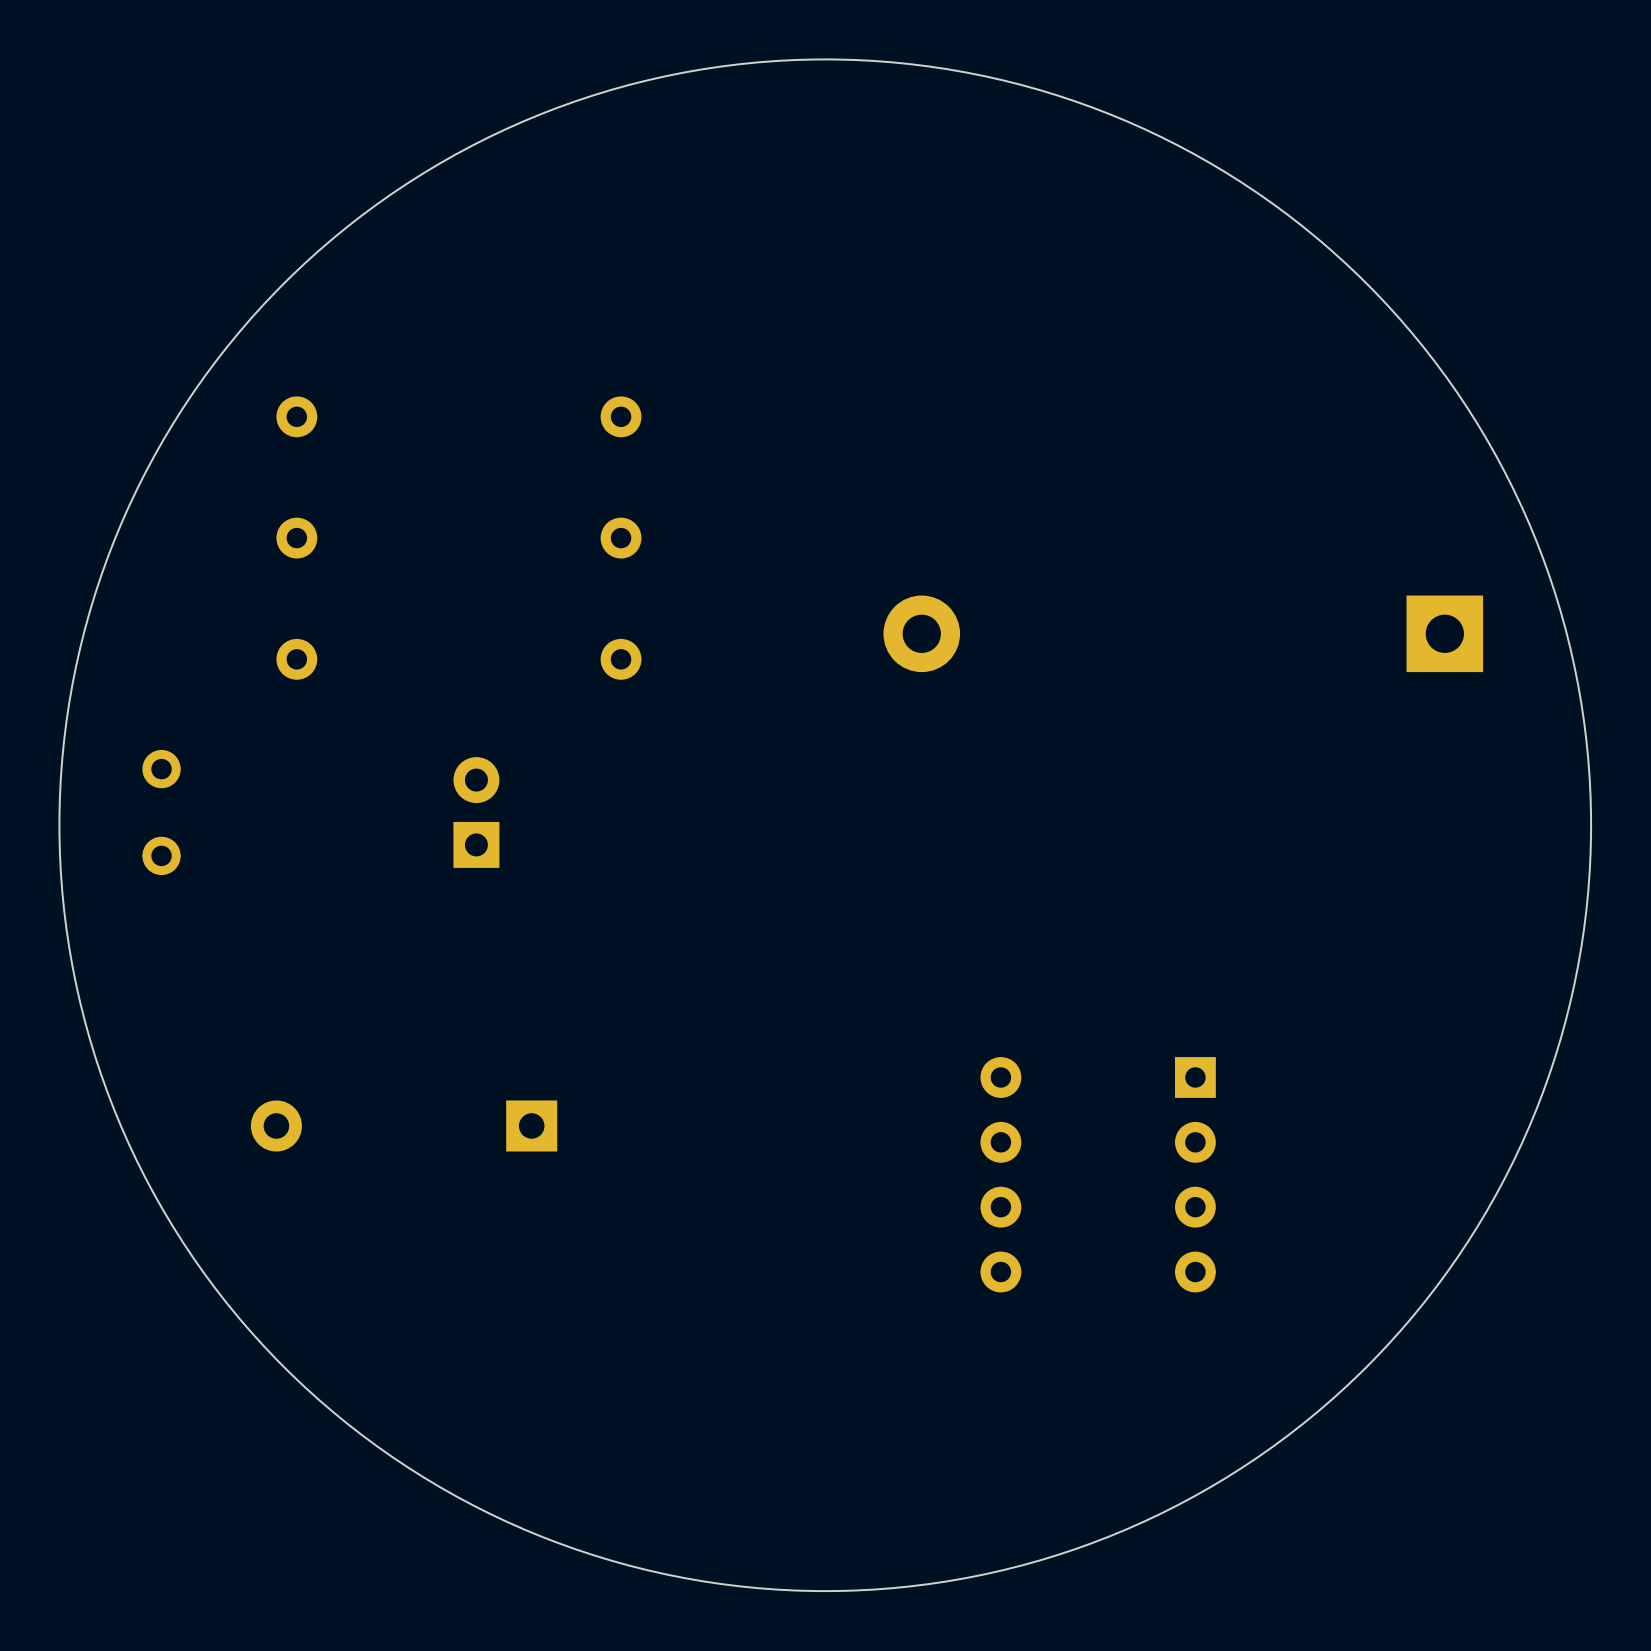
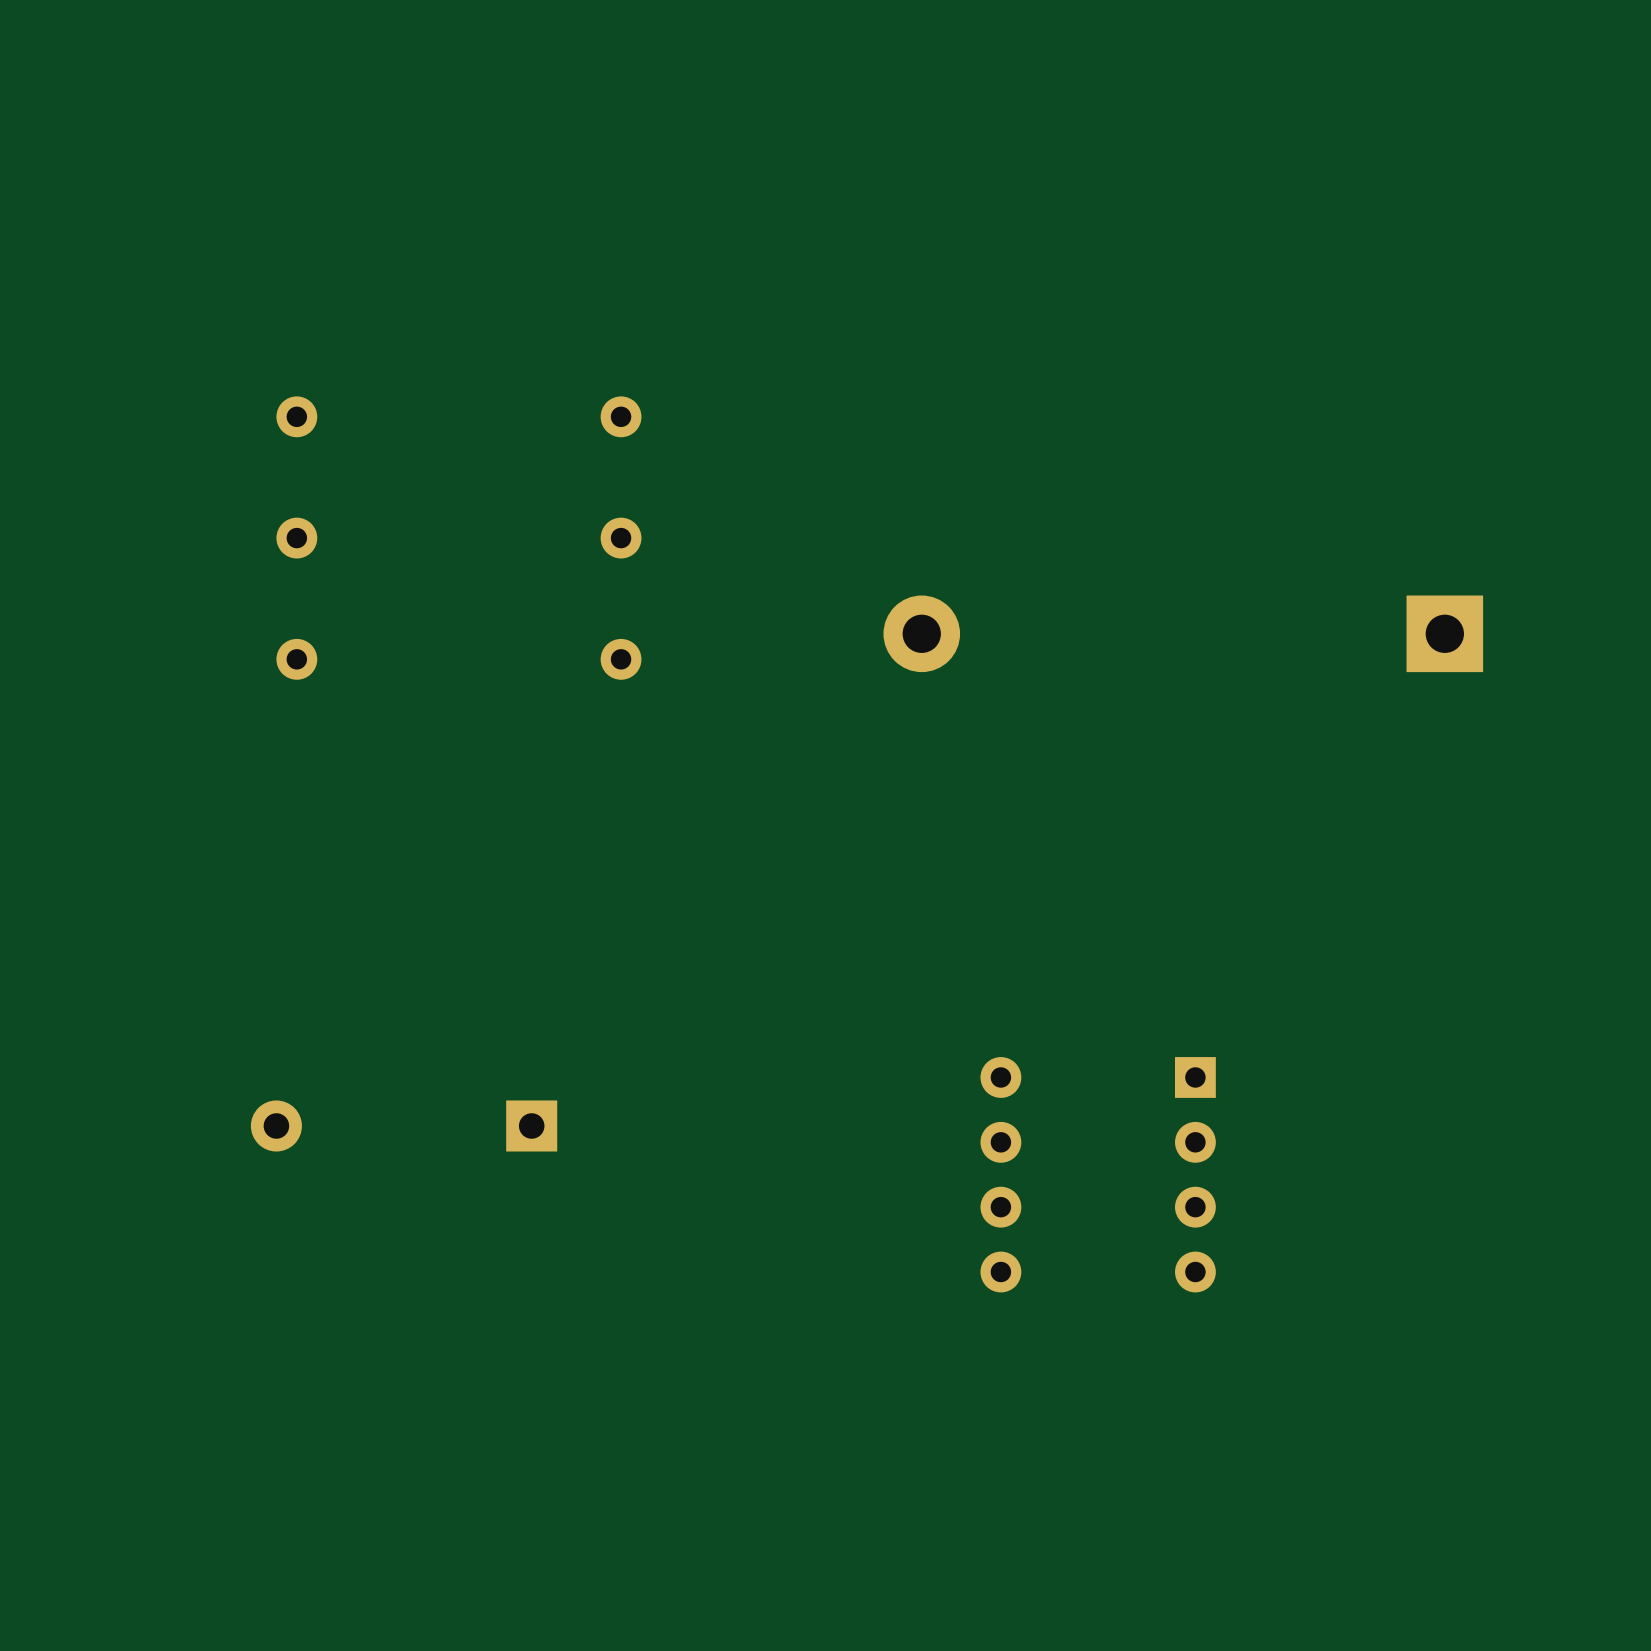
round board edge: [58, 58, 1592, 1592] -> none
part: (161, 812) -> none
part: (476, 812) -> none

